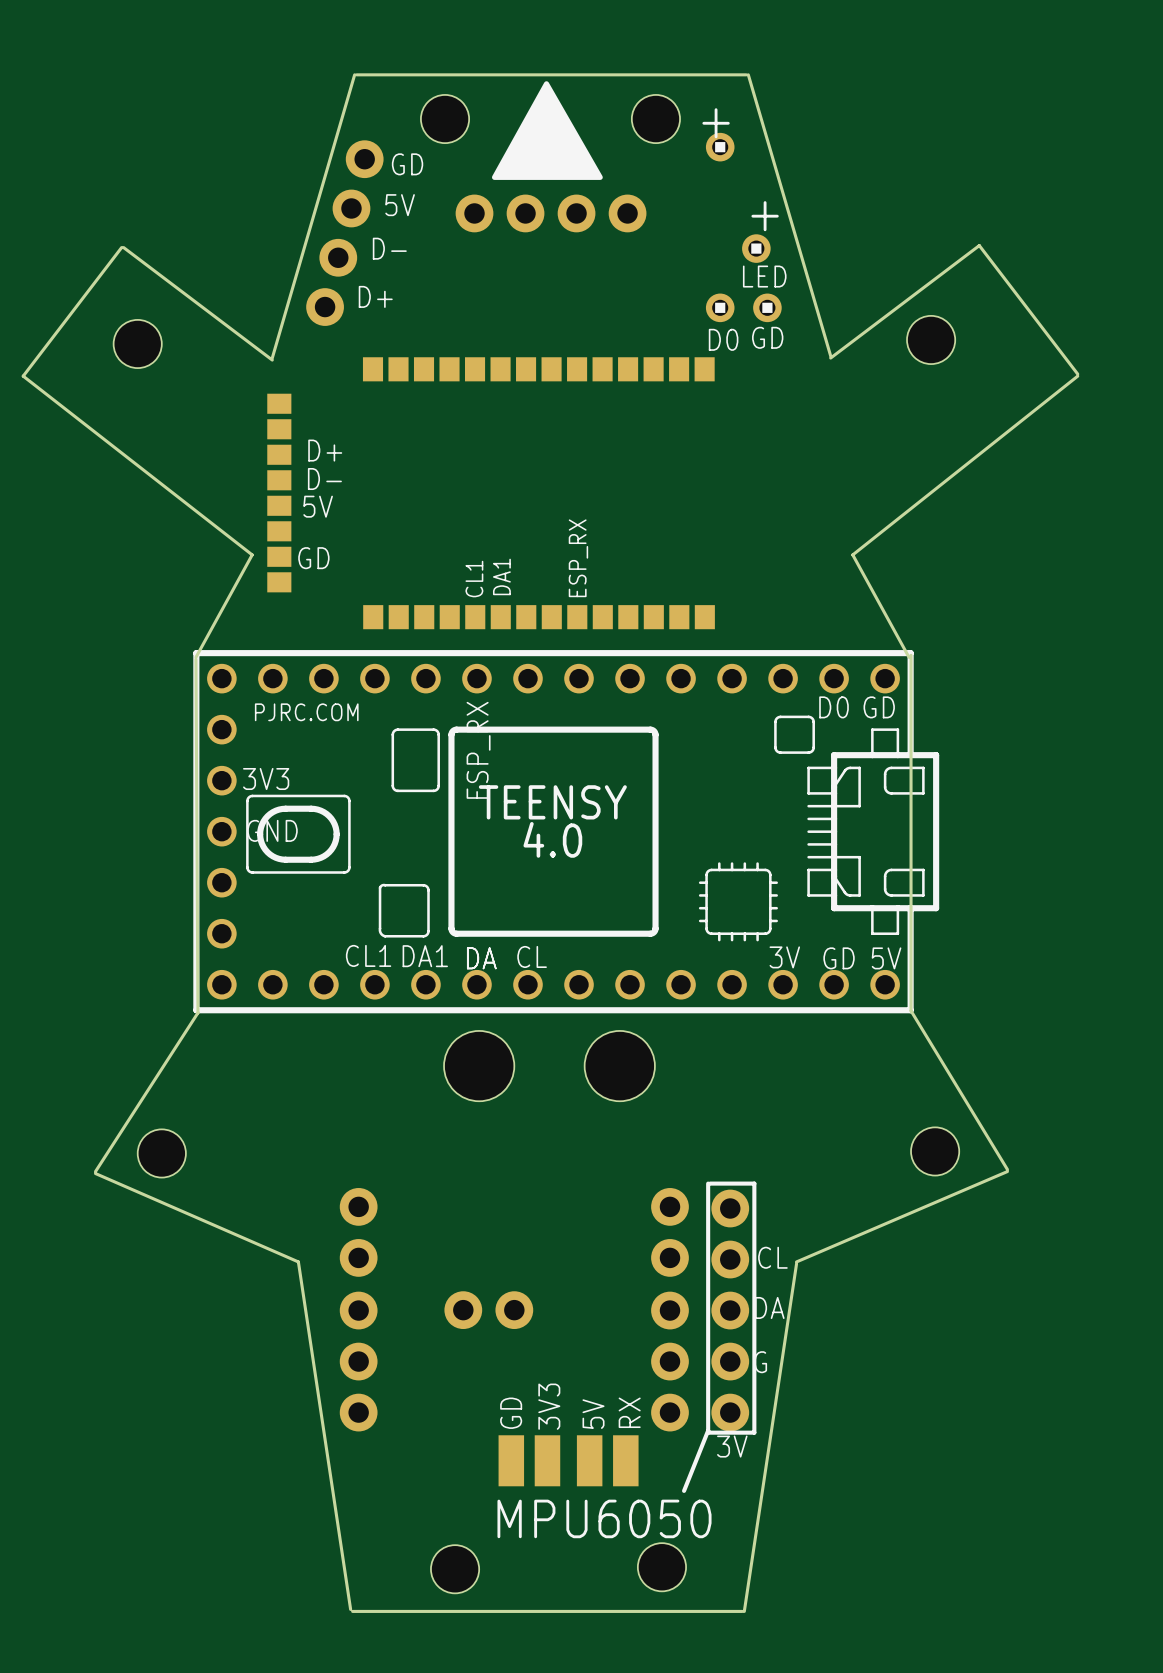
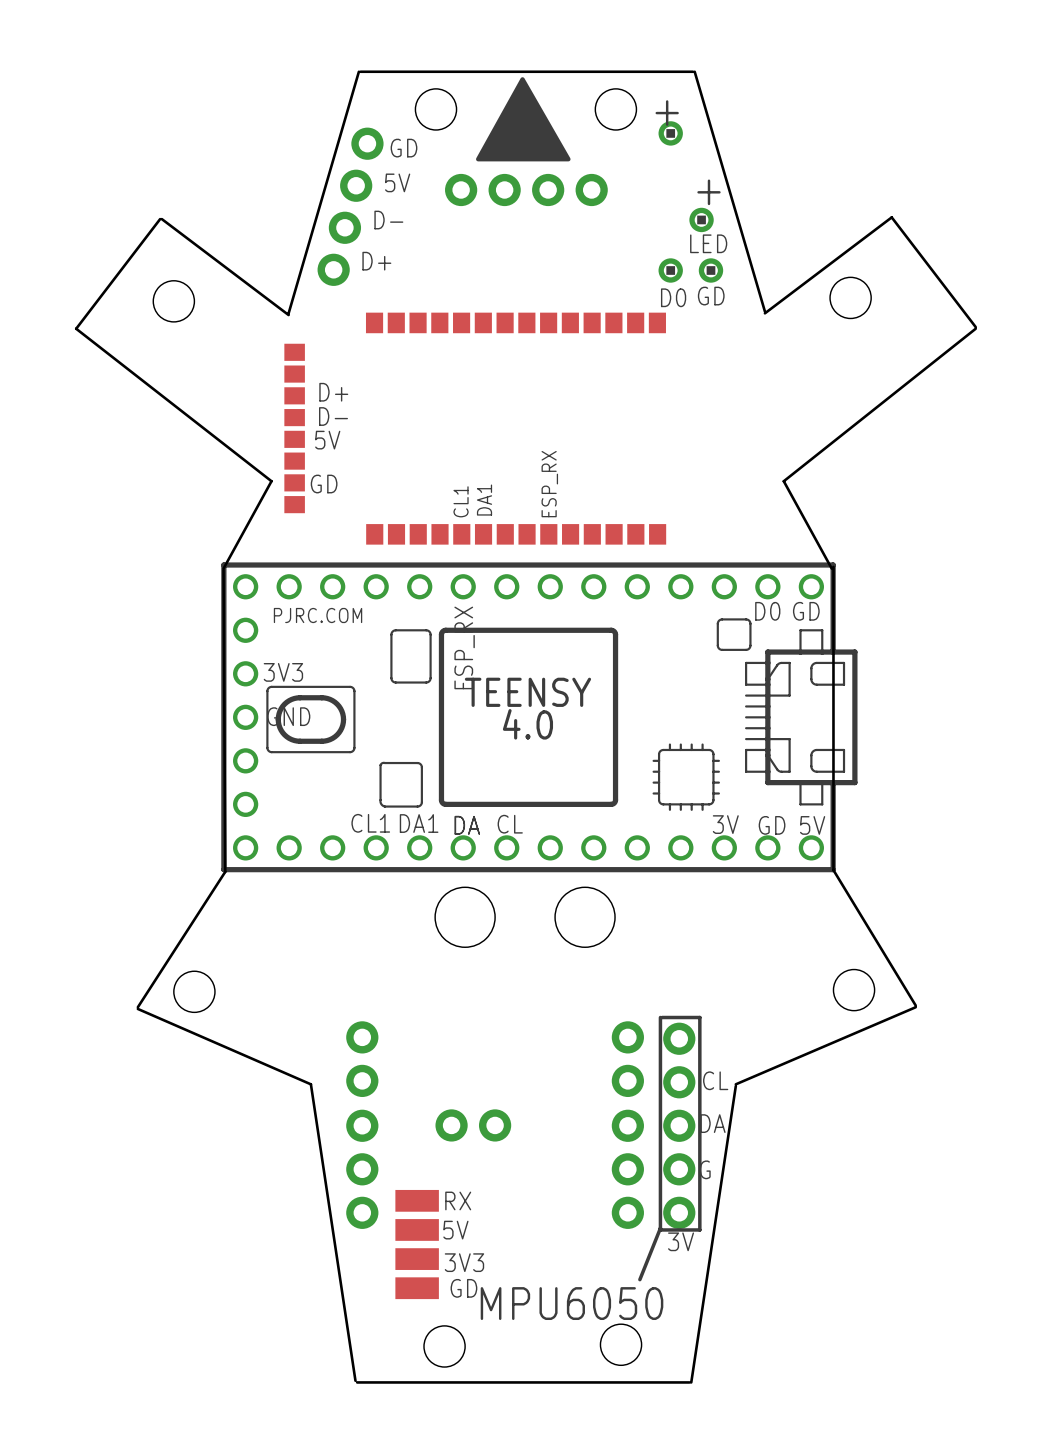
GD rotation: 0° (511, 1460) -> 90° clockwise (417, 1288)
GD position: (511, 1460) -> (417, 1288)
3V3 rotation: 0° (547, 1460) -> 90° clockwise (417, 1259)
3V3 position: (547, 1460) -> (417, 1259)
5V rotation: 0° (589, 1460) -> 90° clockwise (417, 1229)
5V position: (589, 1460) -> (417, 1229)
RX rotation: 0° (625, 1460) -> 90° clockwise (417, 1200)
RX position: (625, 1460) -> (417, 1200)

